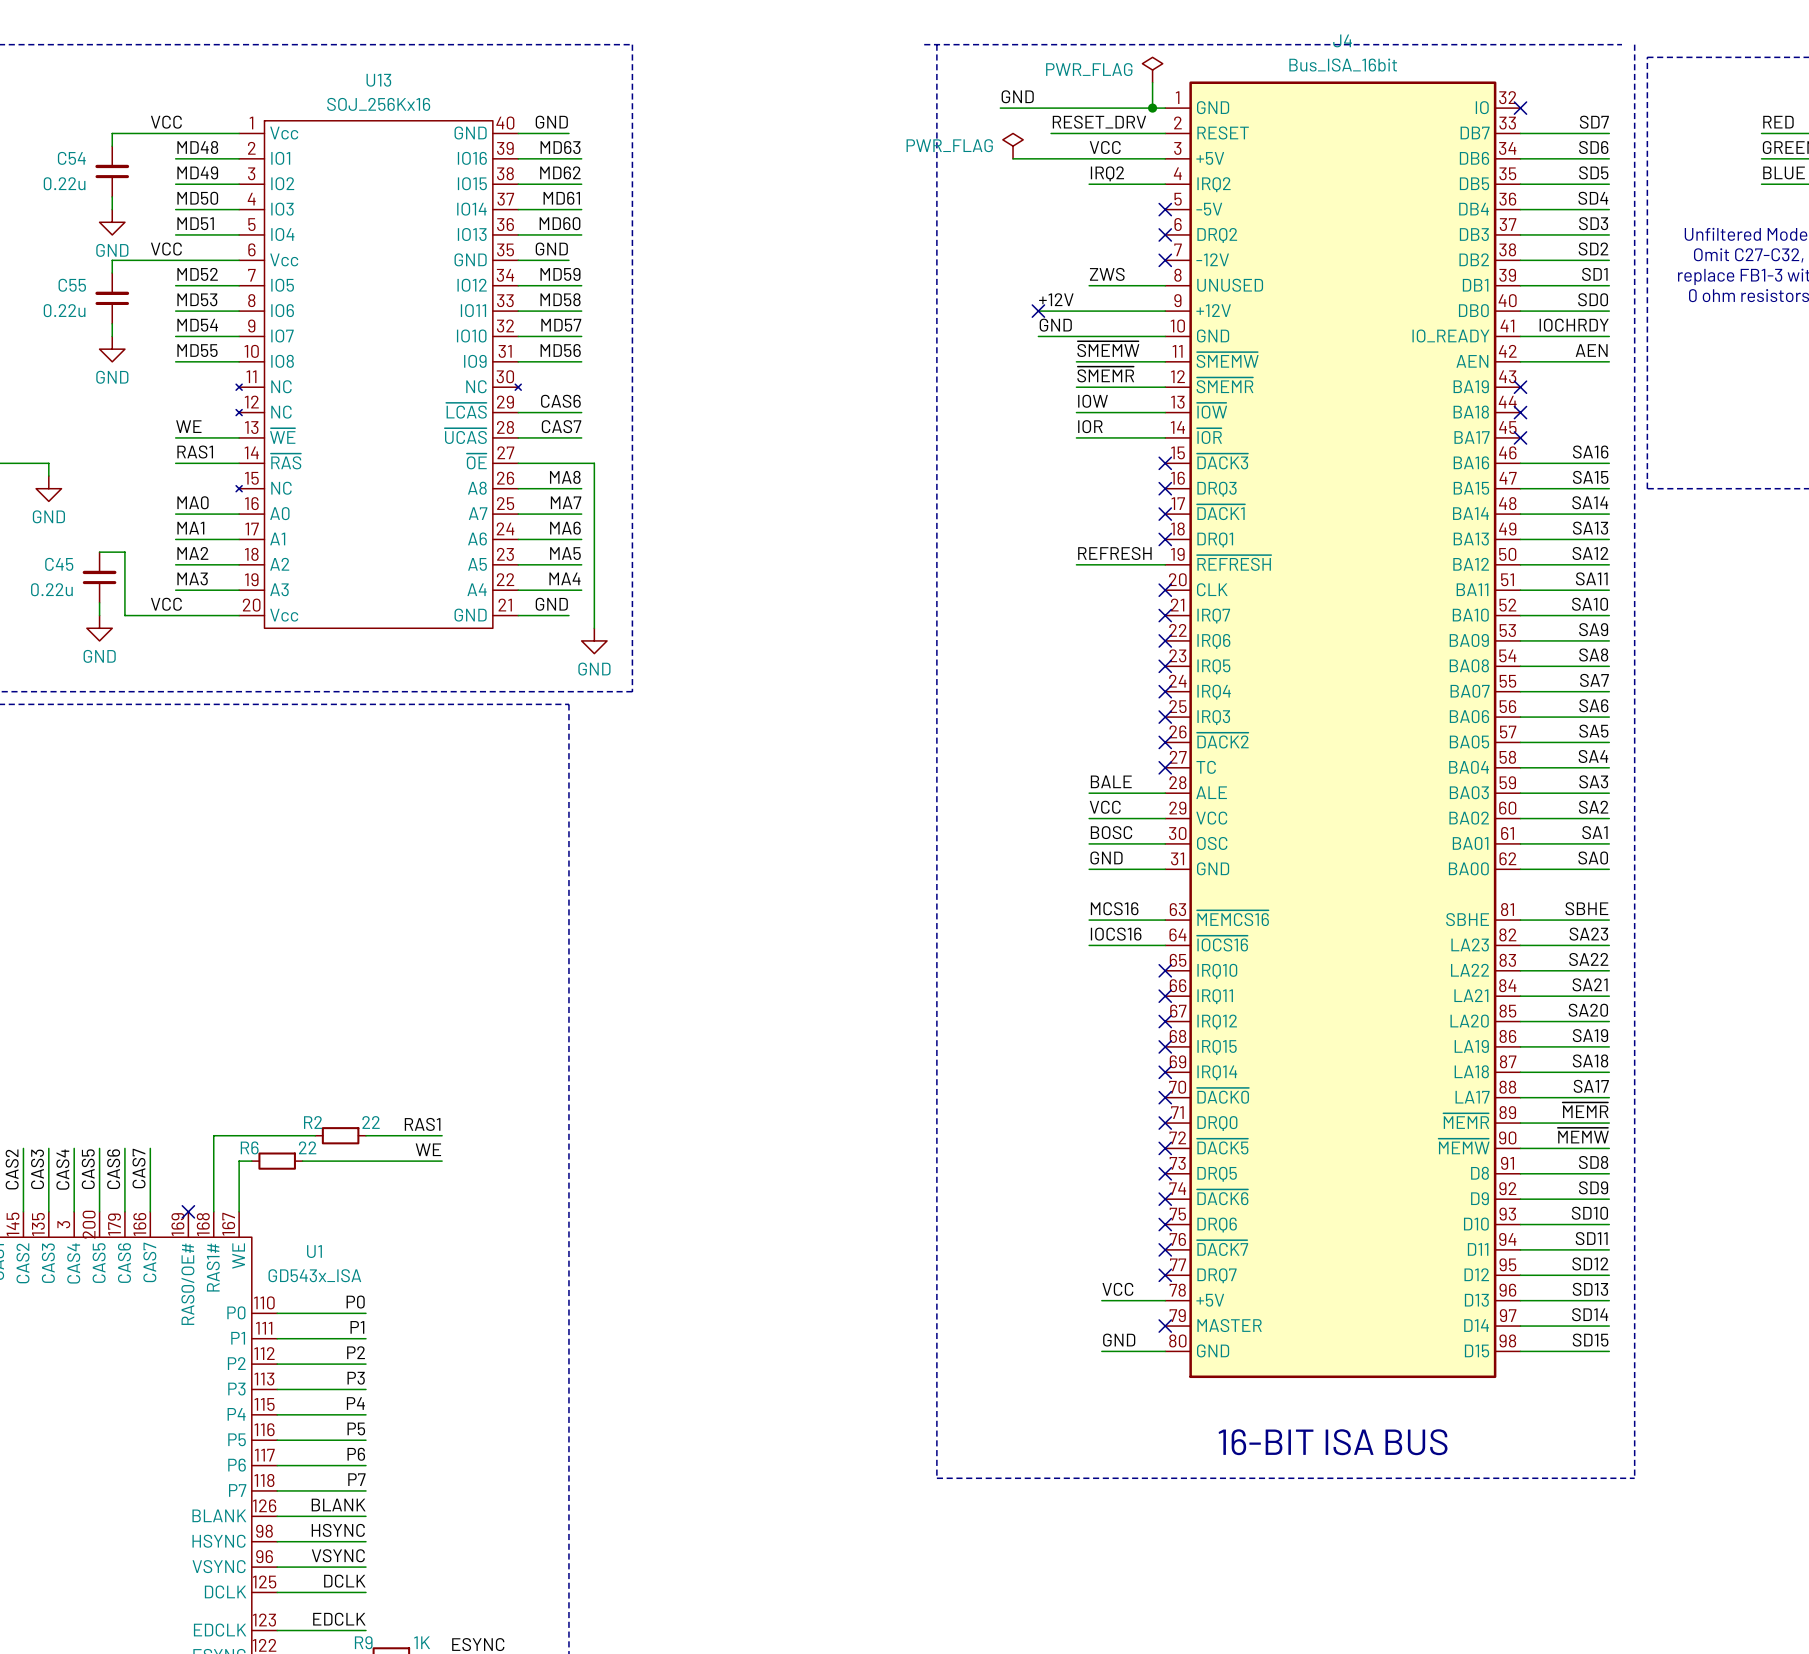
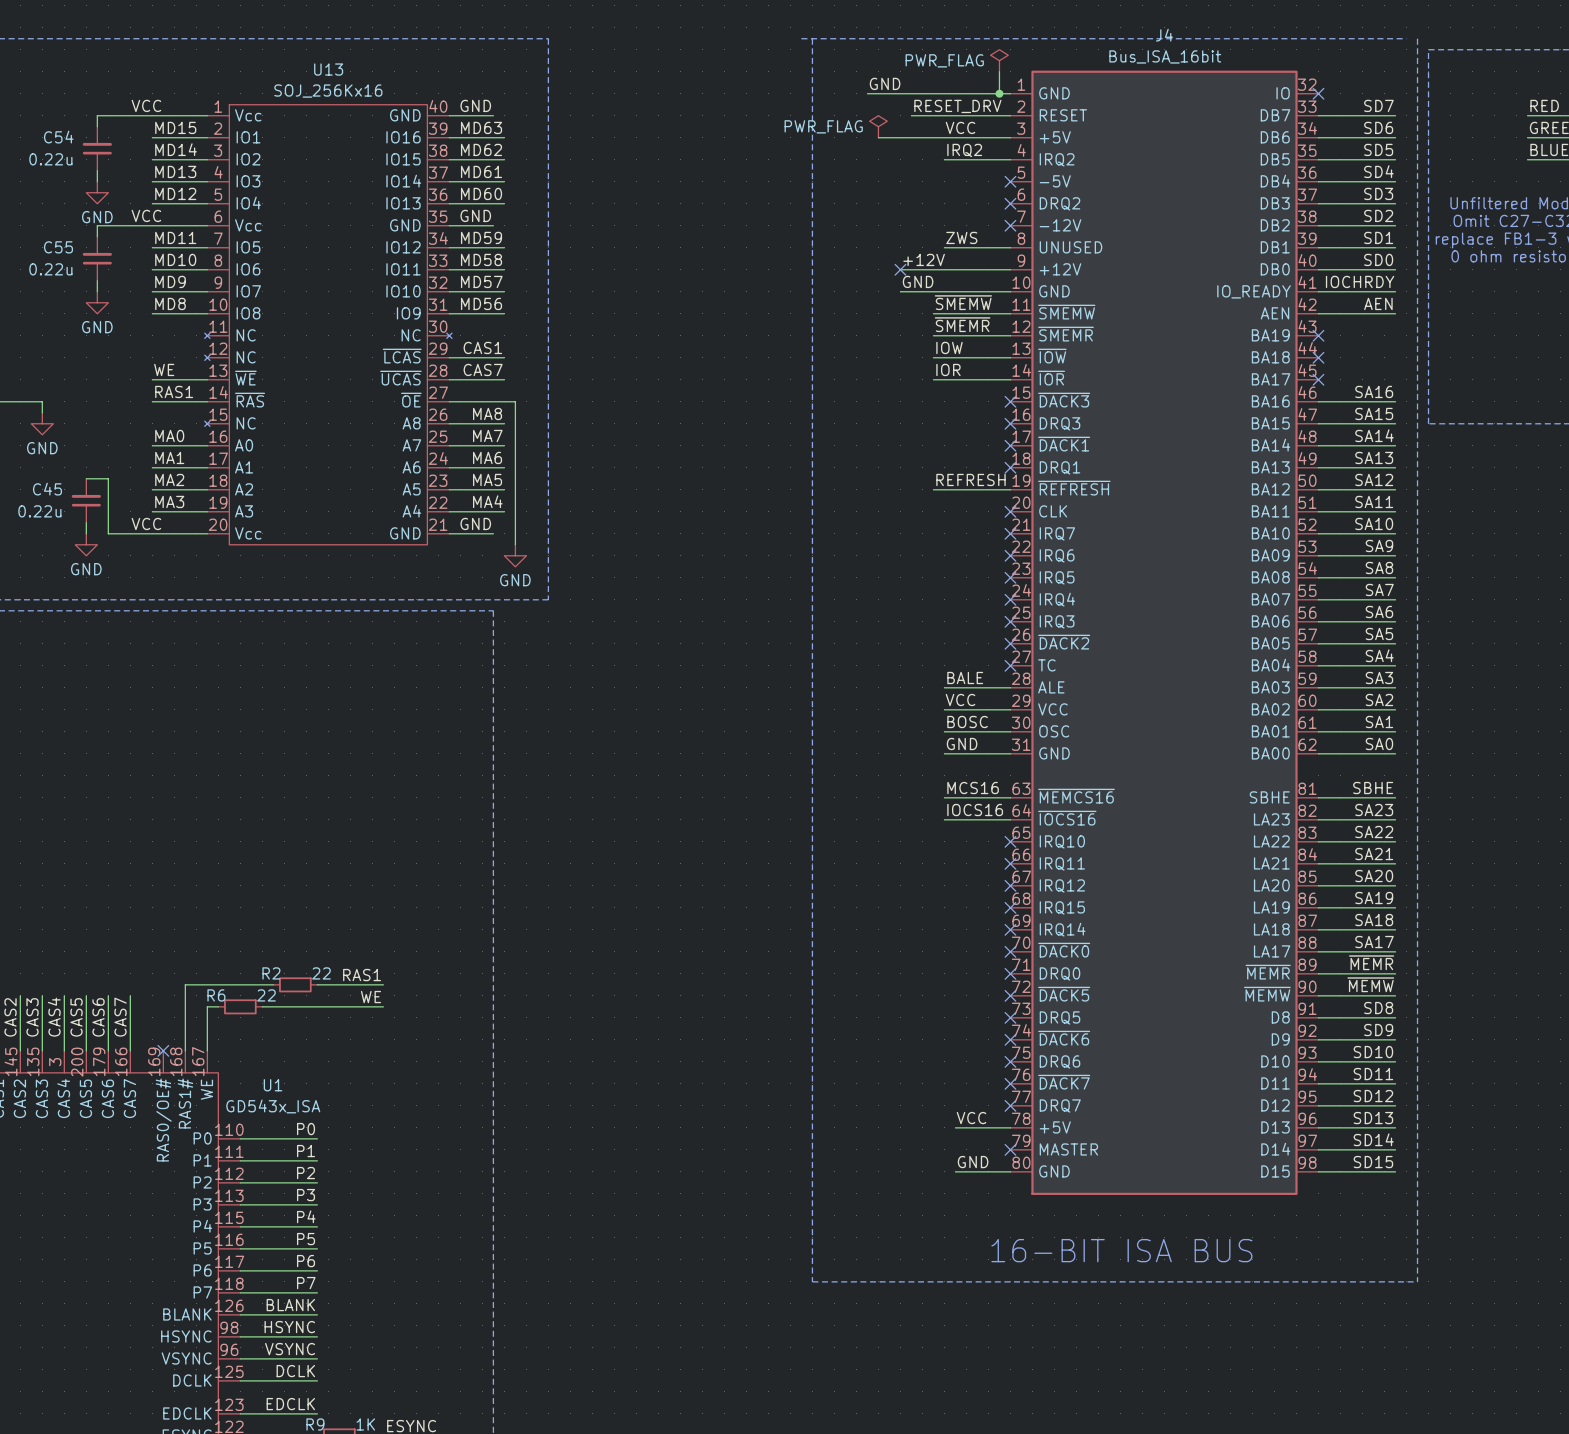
label: MD48 (197, 147) -> MD15 (175, 127)
label: MD49 (197, 172) -> MD14 (176, 149)
label: MD50 (197, 198) -> MD13 (175, 171)
label: MD51 (195, 223) -> MD12 (175, 193)
label: MD52 (197, 274) -> MD11 (175, 237)
label: MD53 (197, 299) -> MD10 (175, 259)
label: MD54 (197, 325) -> MD9 (170, 281)
label: MD55 (197, 350) -> MD8 (170, 303)
label: CAS6 (560, 401) -> CAS1 (482, 347)

